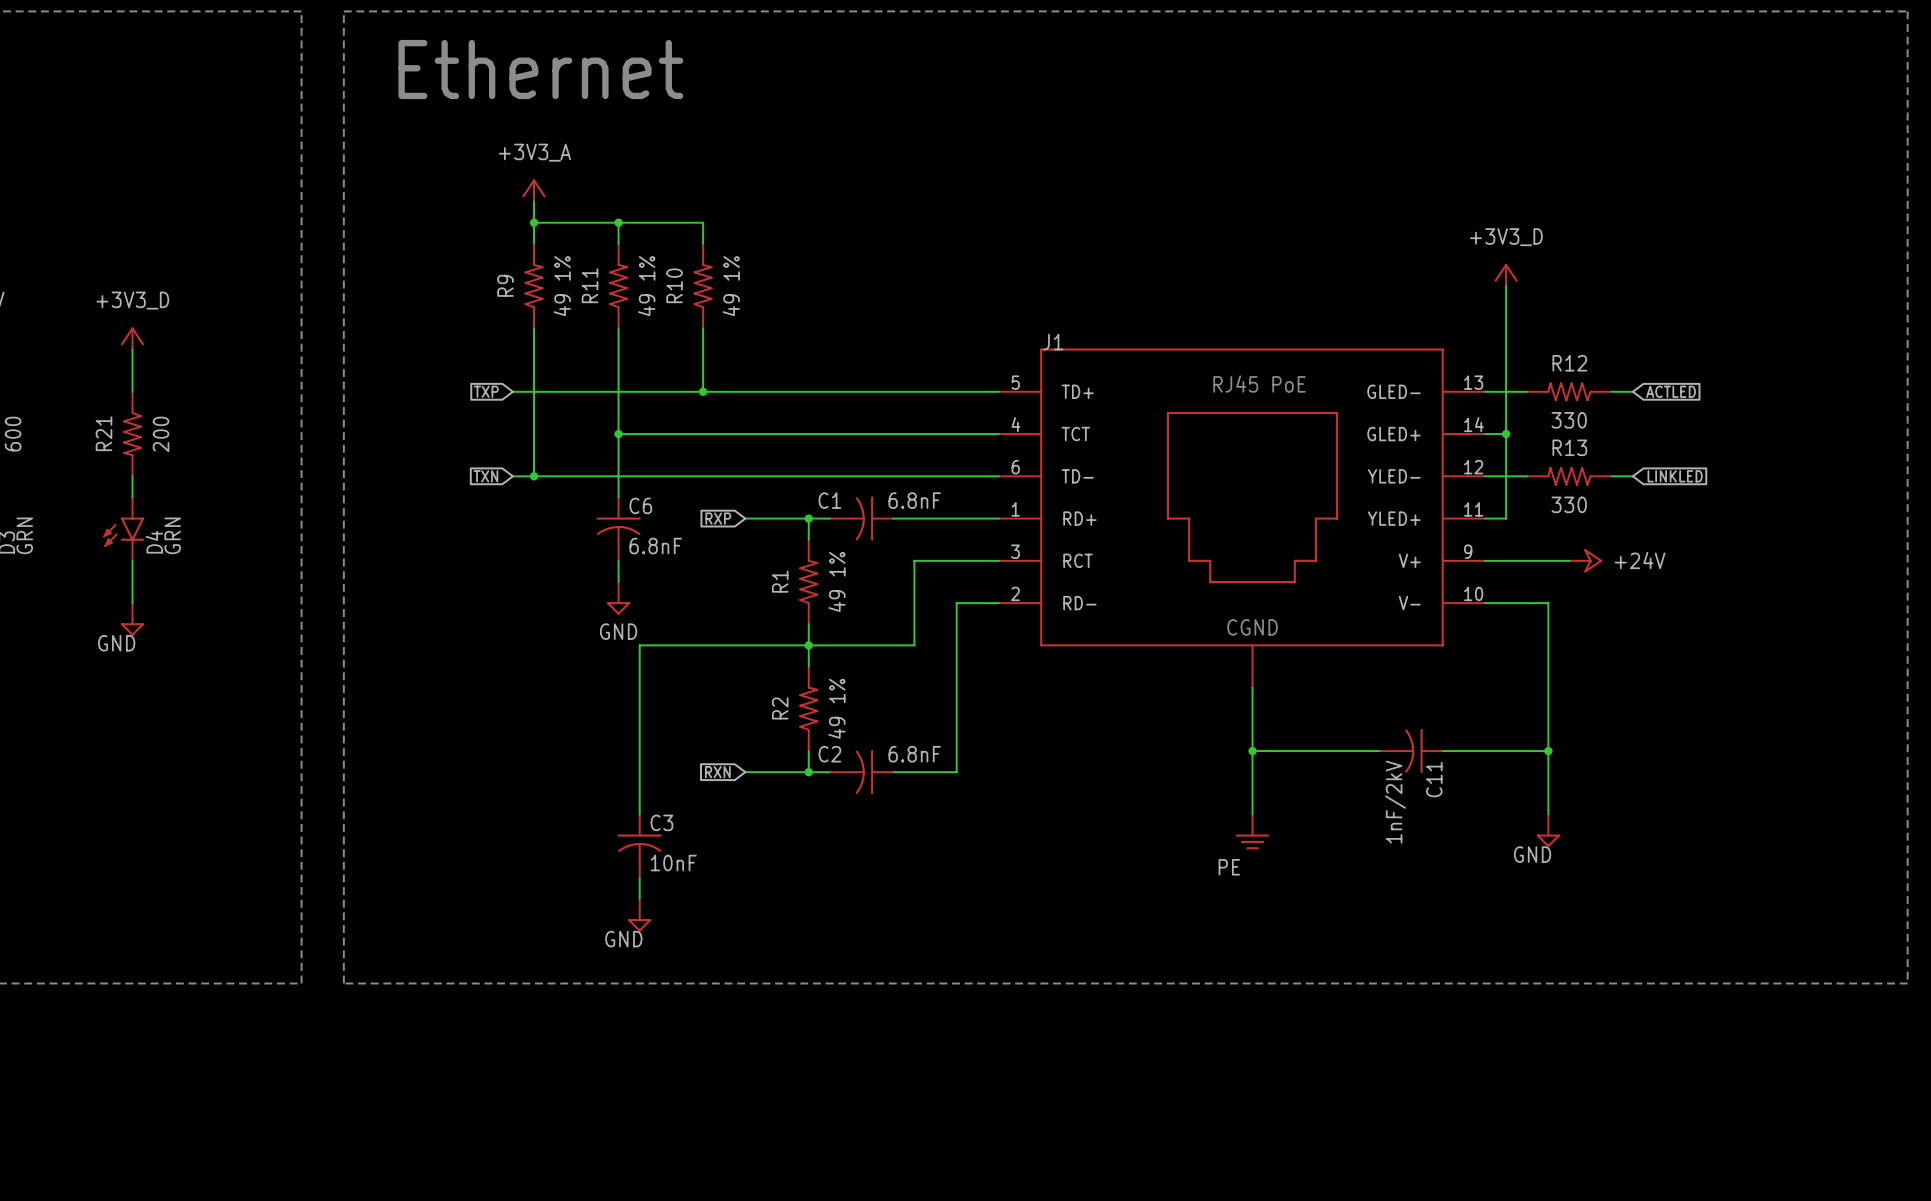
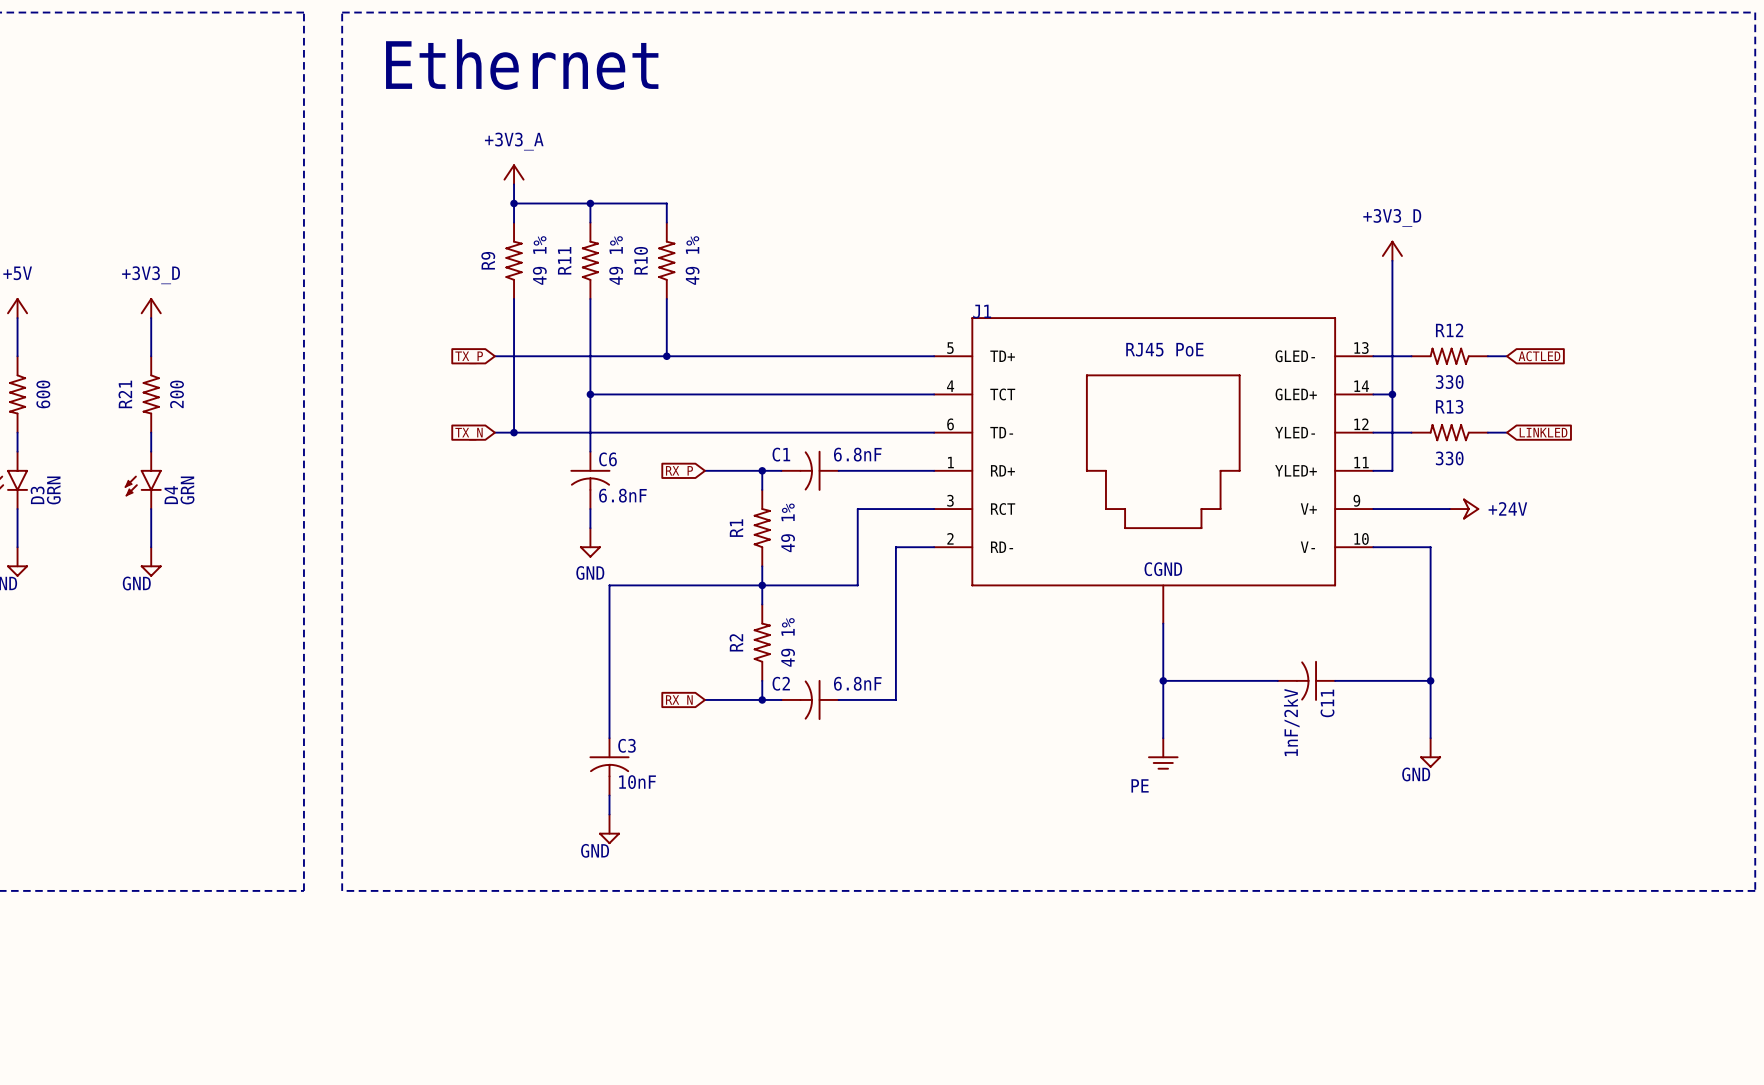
global label: TXP (486, 391) -> TX_P (469, 357)
global label: TXN (485, 476) -> TX_N (469, 434)
global label: RXP (718, 518) -> RX_P (679, 472)
global label: RXN (717, 772) -> RX_N (679, 701)

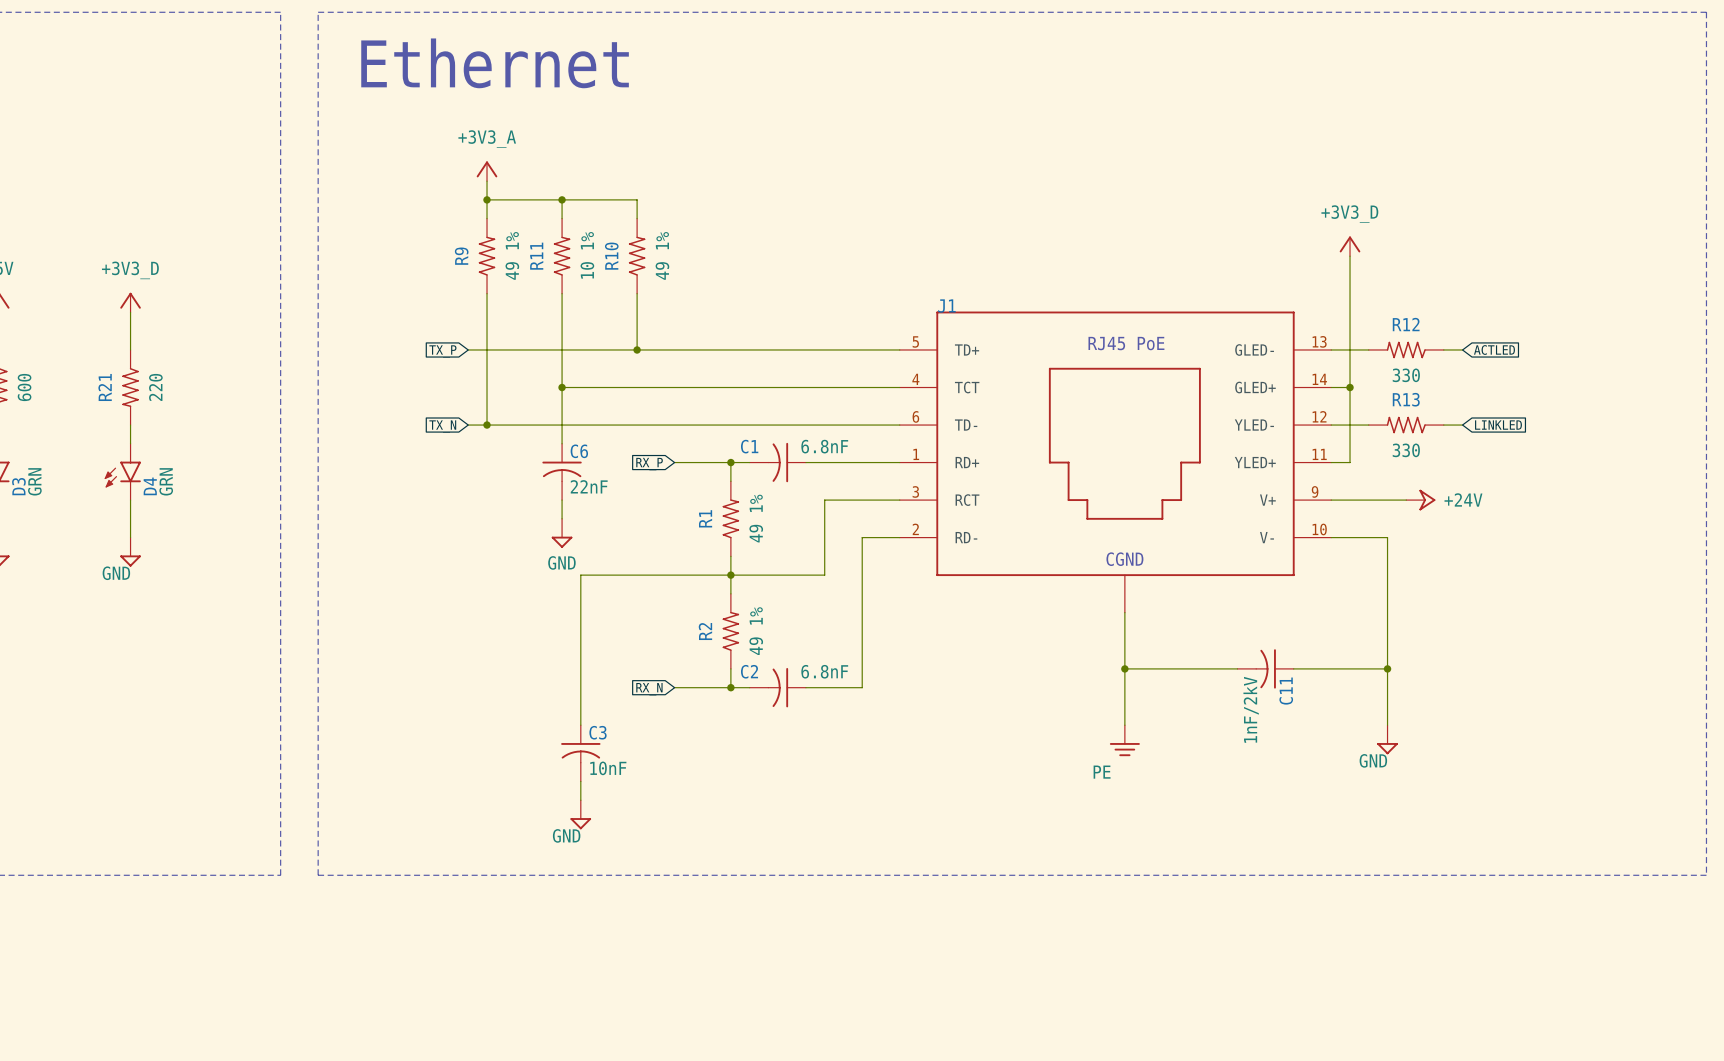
R11 value: 49 1% (616, 260) -> 10 1% (587, 255)
R21 value: 200 (177, 394) -> 220 (155, 387)
C6 value: 6.8nF (622, 495) -> 22nF (589, 486)

